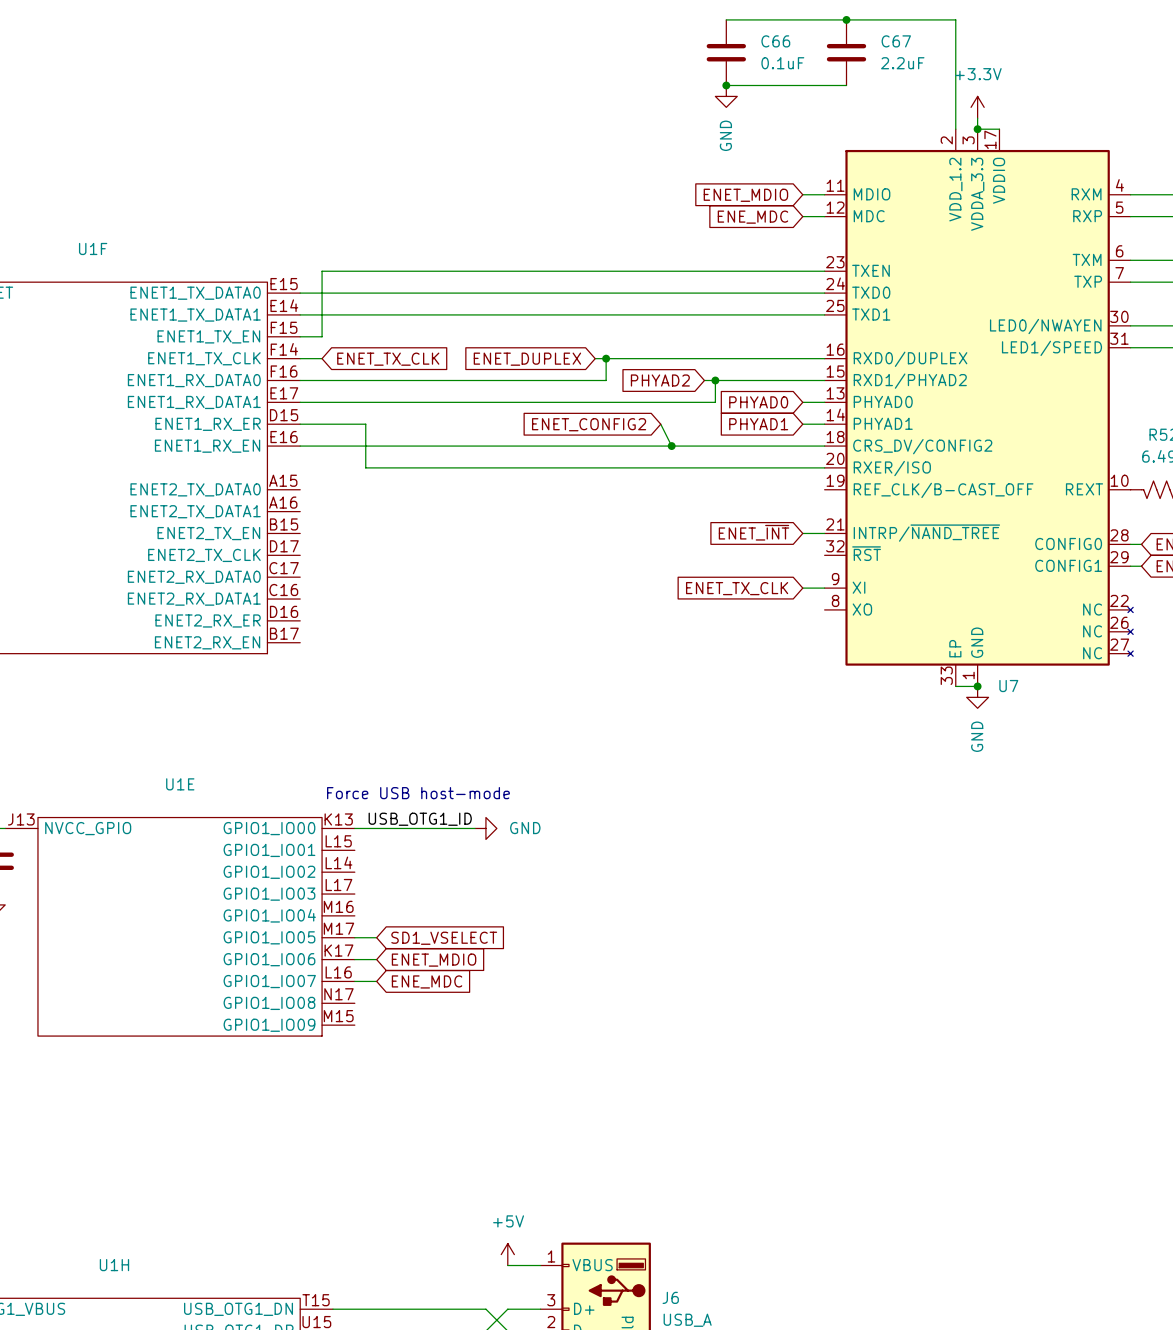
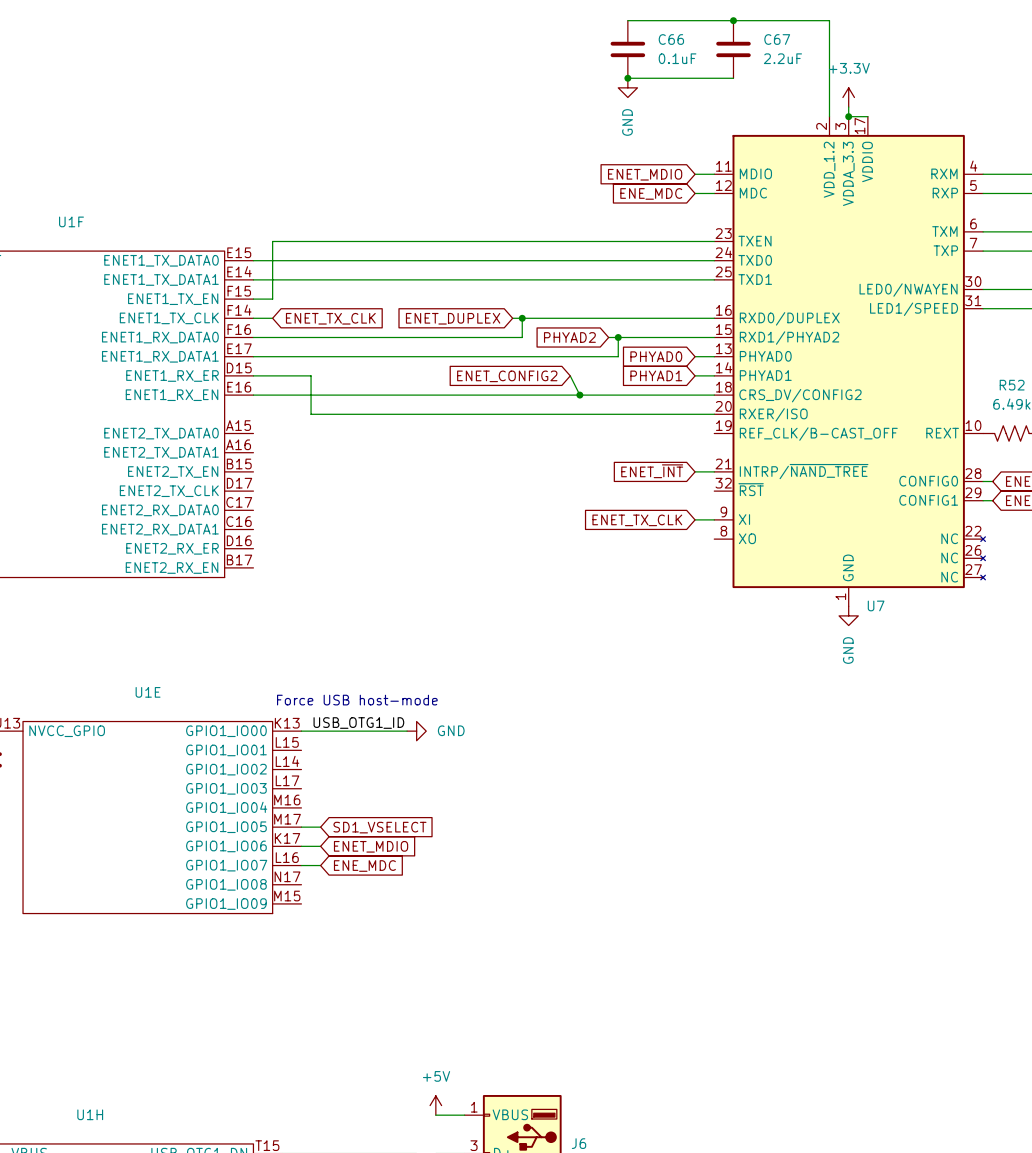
U7 symbol: [824, 129, 1134, 687] -> [714, 116, 986, 607]
wire: (955, 686) (977, 686) -> none
junction: (977, 686) -> none

